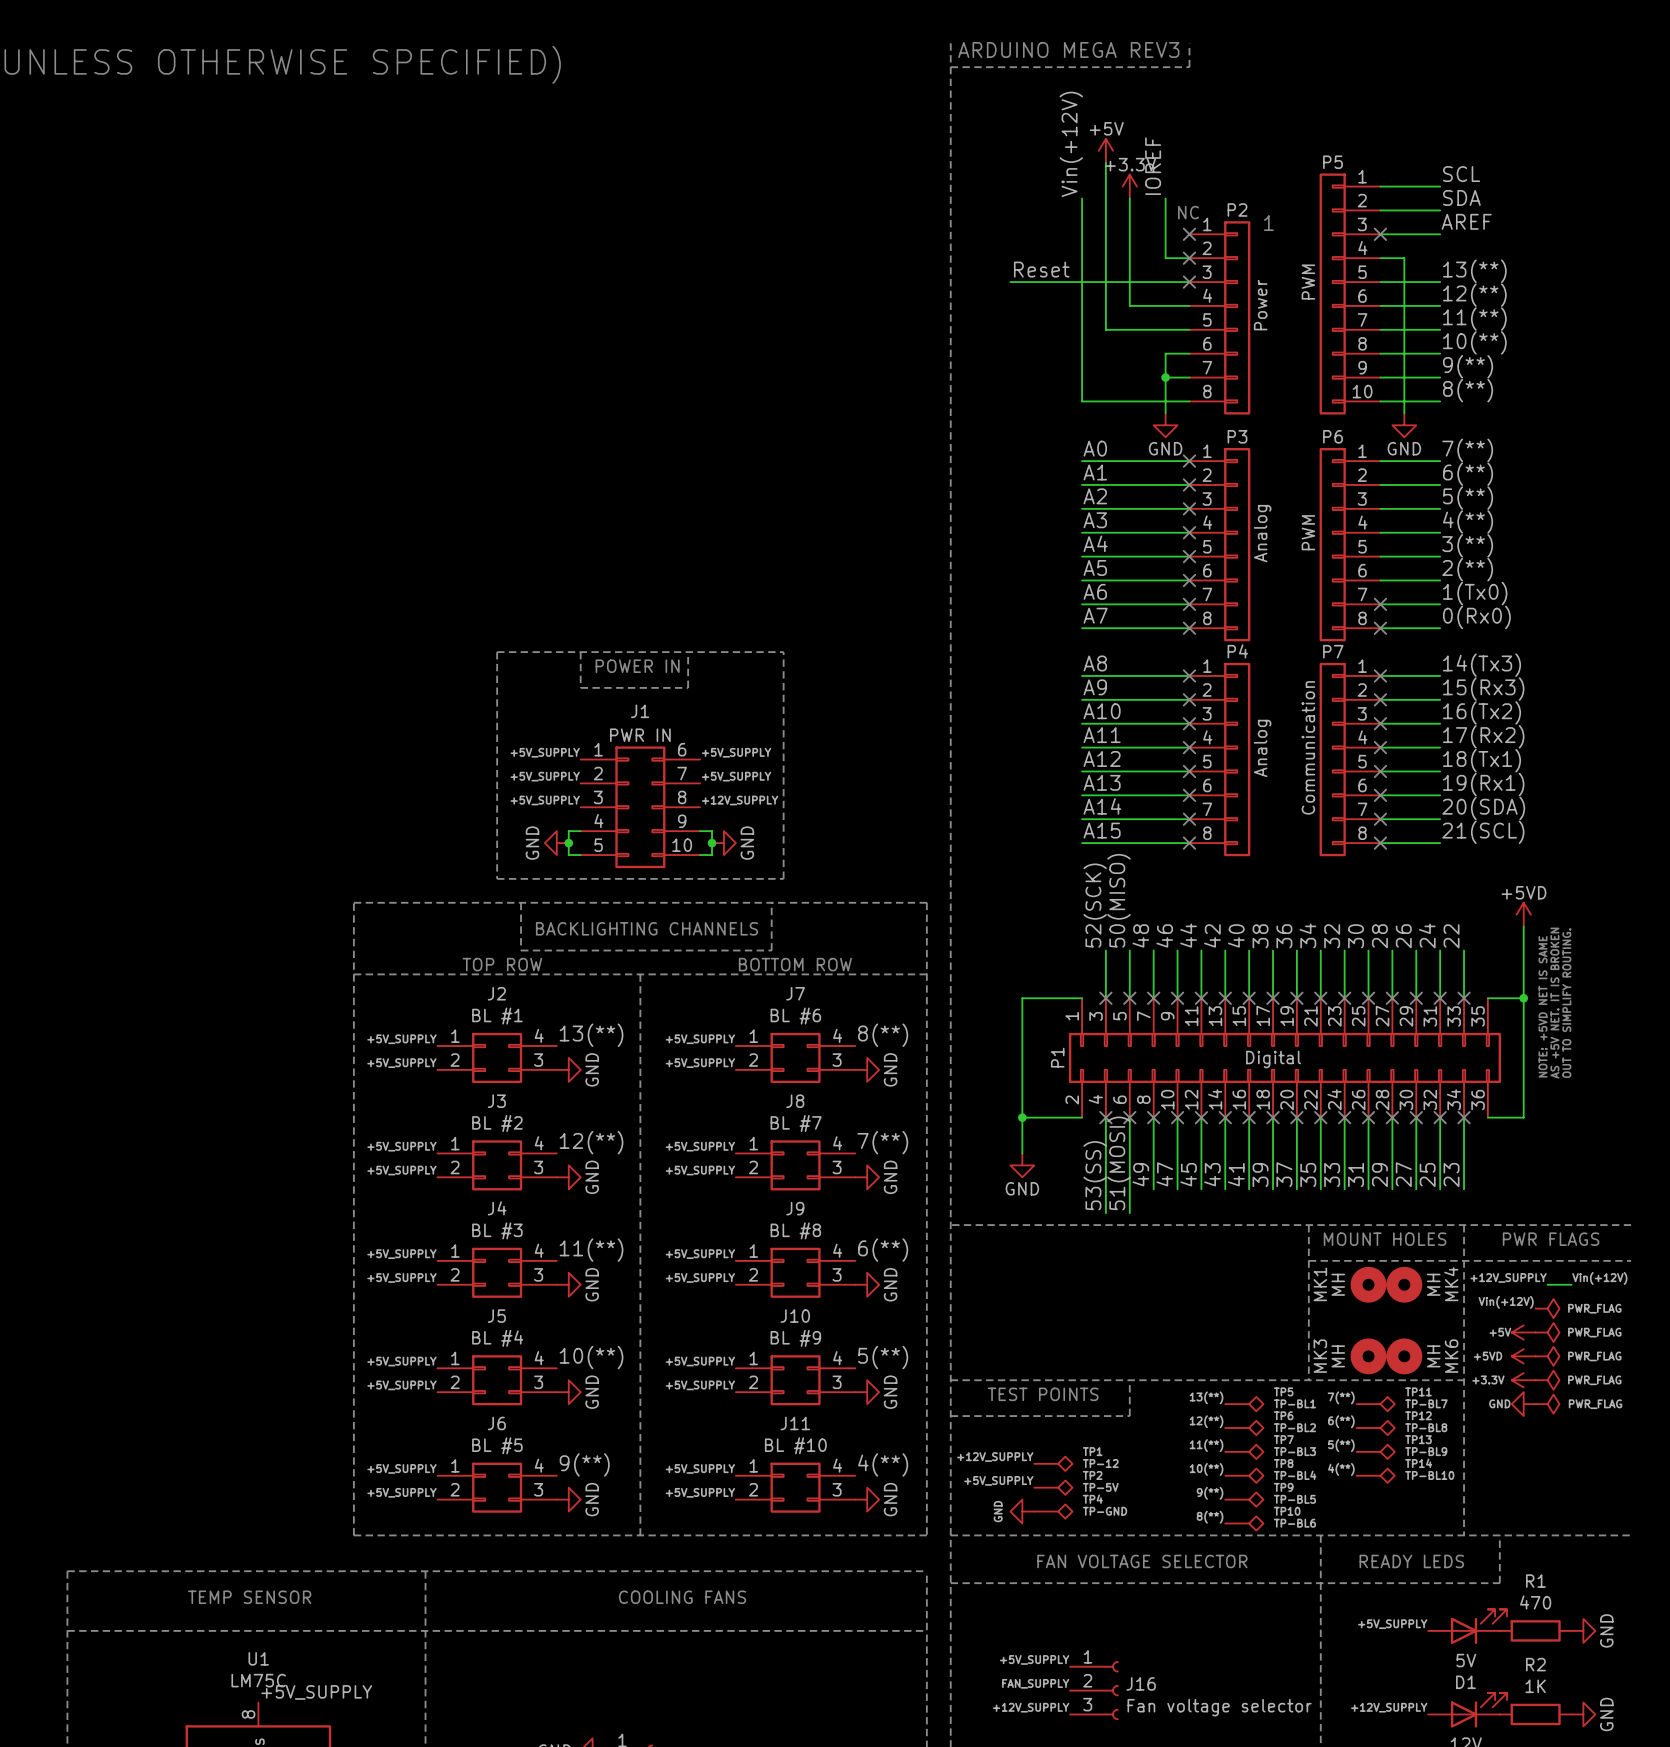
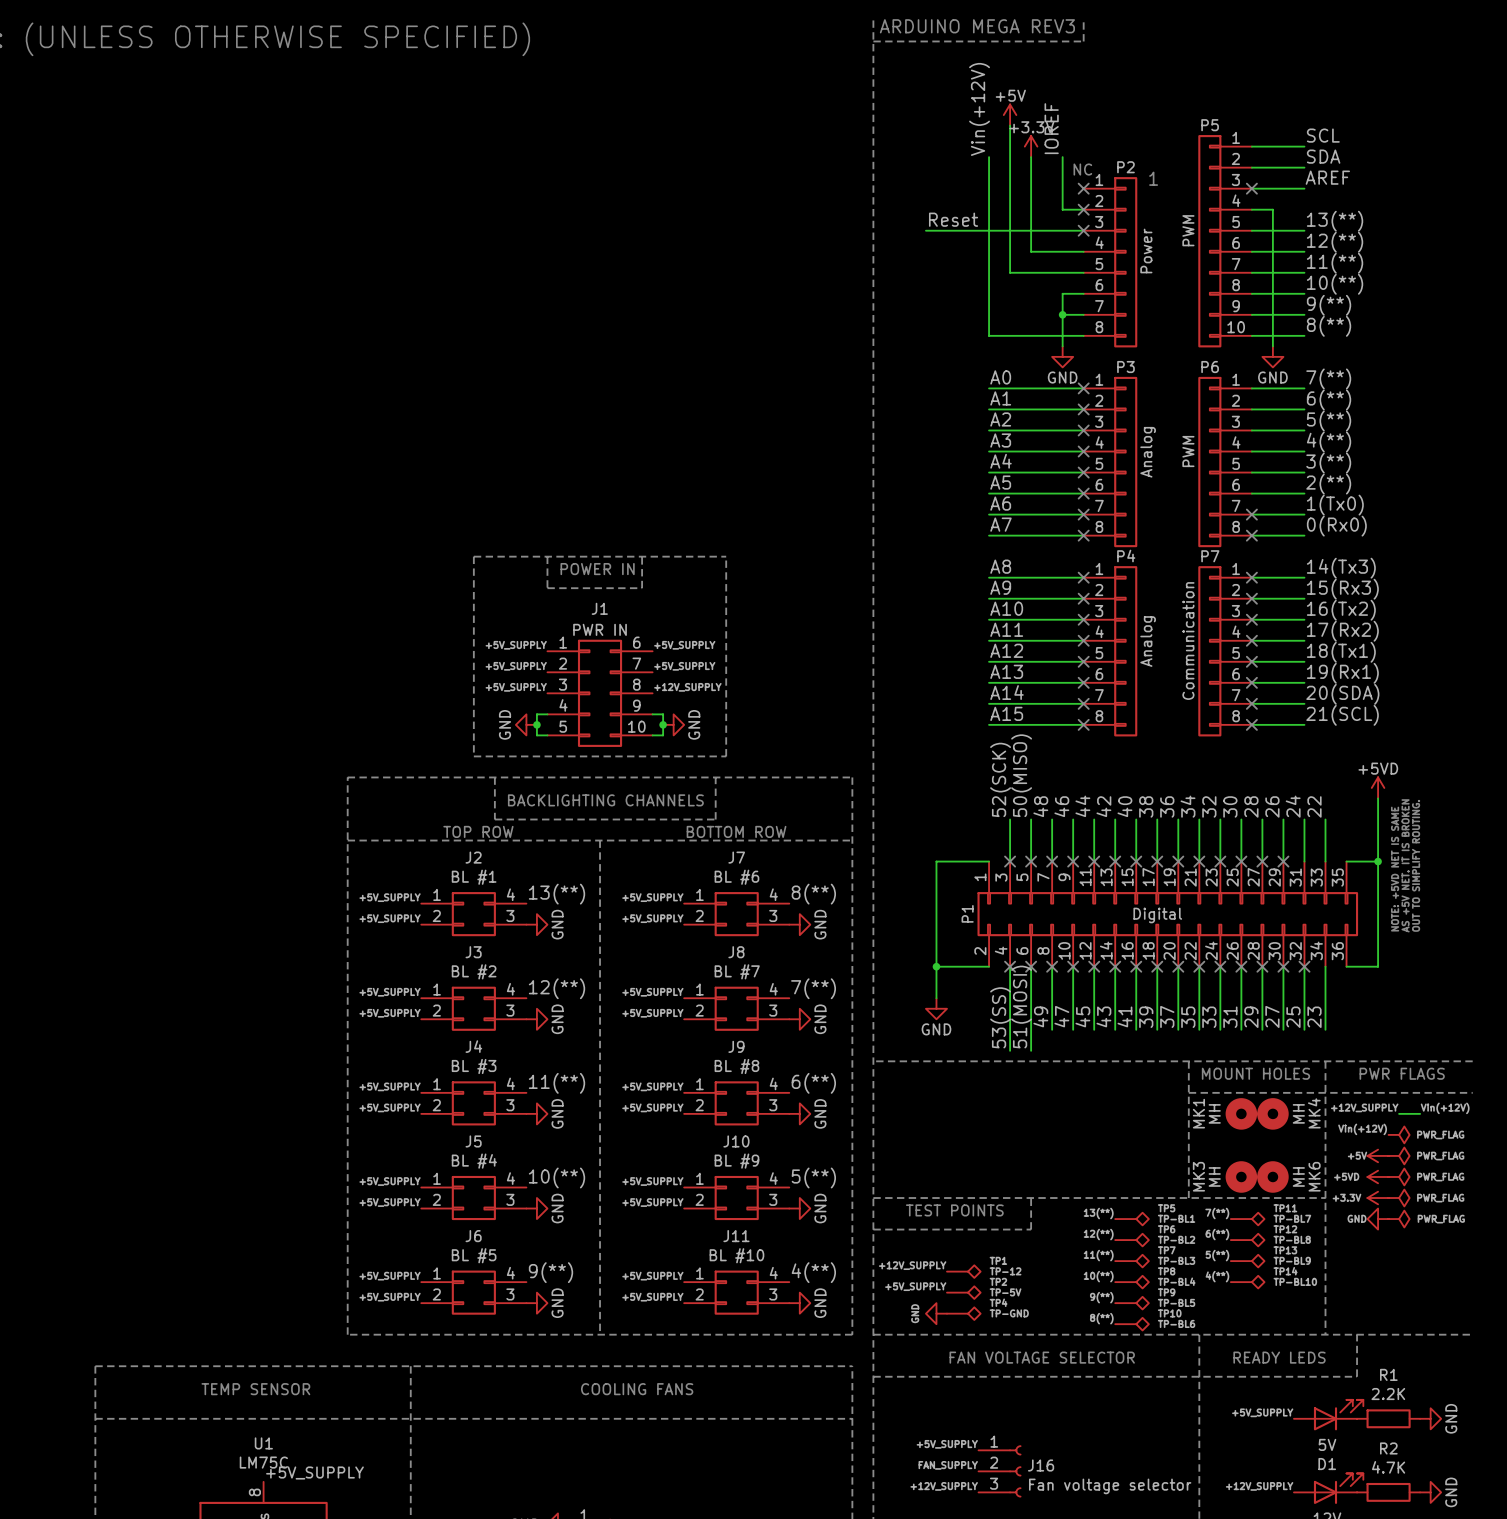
no-connect mark: (1440, 998) -> none
no-connect mark: (1464, 998) -> none
no-connect mark: (1464, 1117) -> none
R1 value: 470 (1535, 1602) -> 2.2K (1388, 1394)
R2 value: 1K (1535, 1686) -> 4.7K (1388, 1467)

